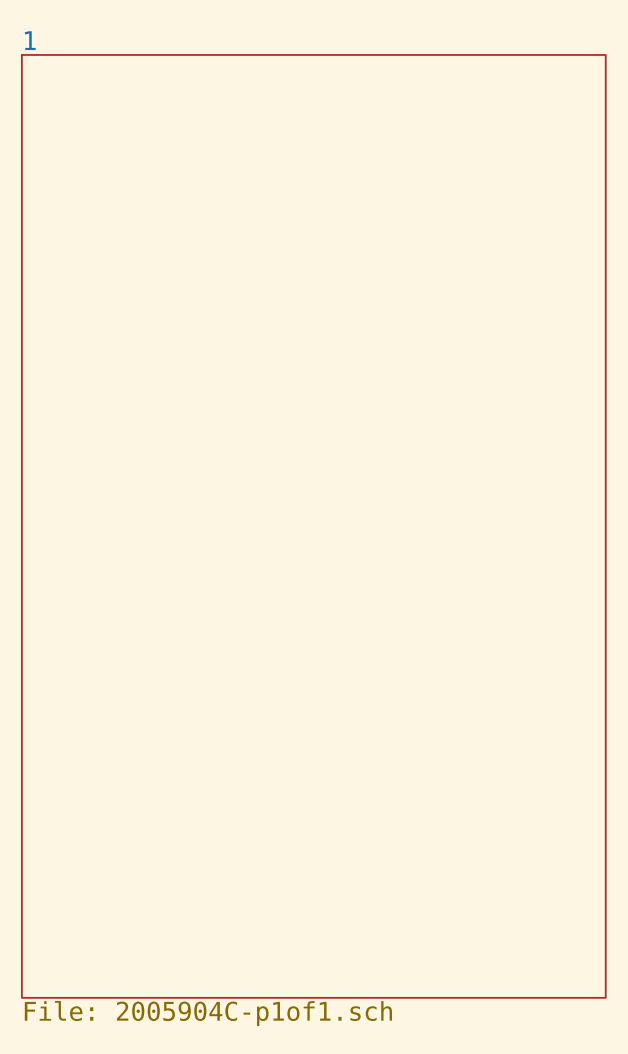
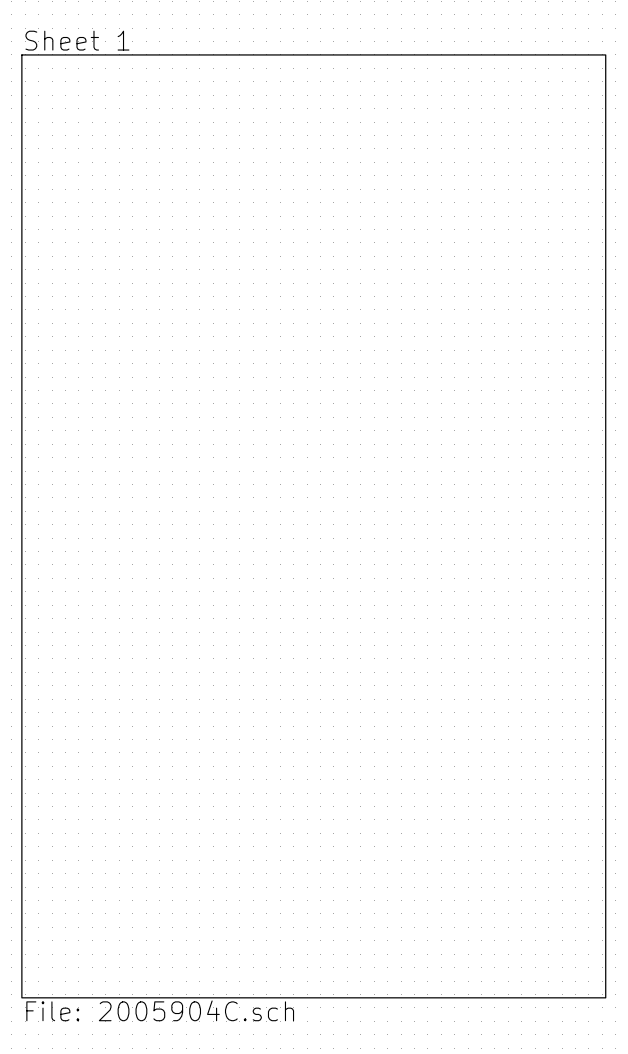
sheet 1 name: 1 (30, 40) -> Sheet 1 (77, 40)
sheet 1 value: File: 2005904C-p1of1.sch (208, 1013) -> File: 2005904C.sch (160, 1010)

